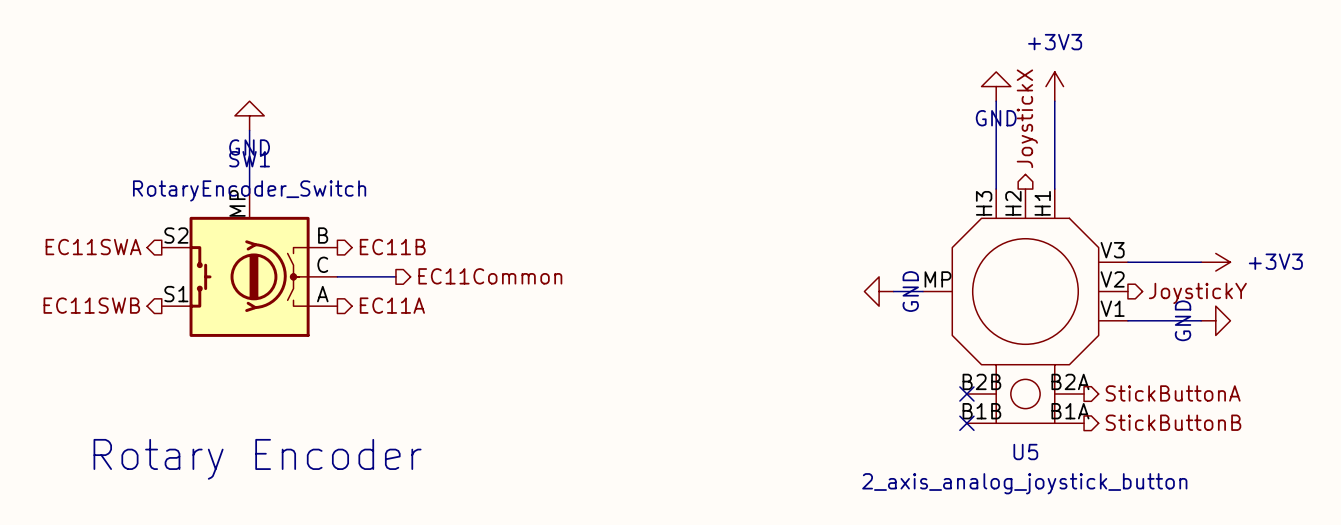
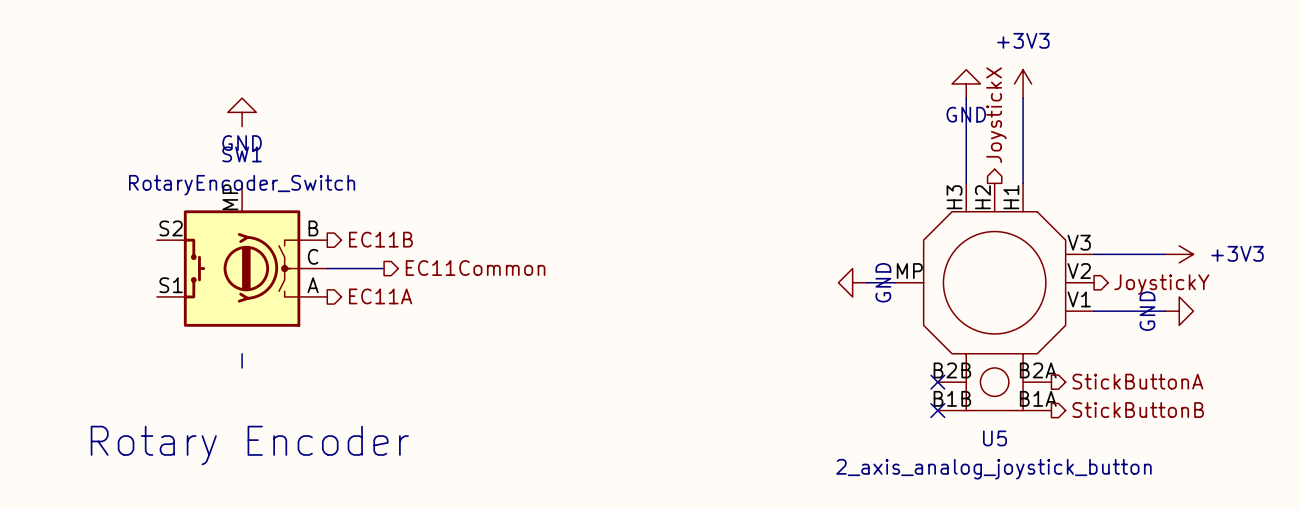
wire: (249, 130) (249, 189) -> none
hierarchical label: EC11SWA (93, 247) -> none
hierarchical label: EC11SWB (91, 305) -> none
wire: none -> (242, 353) (242, 367)

